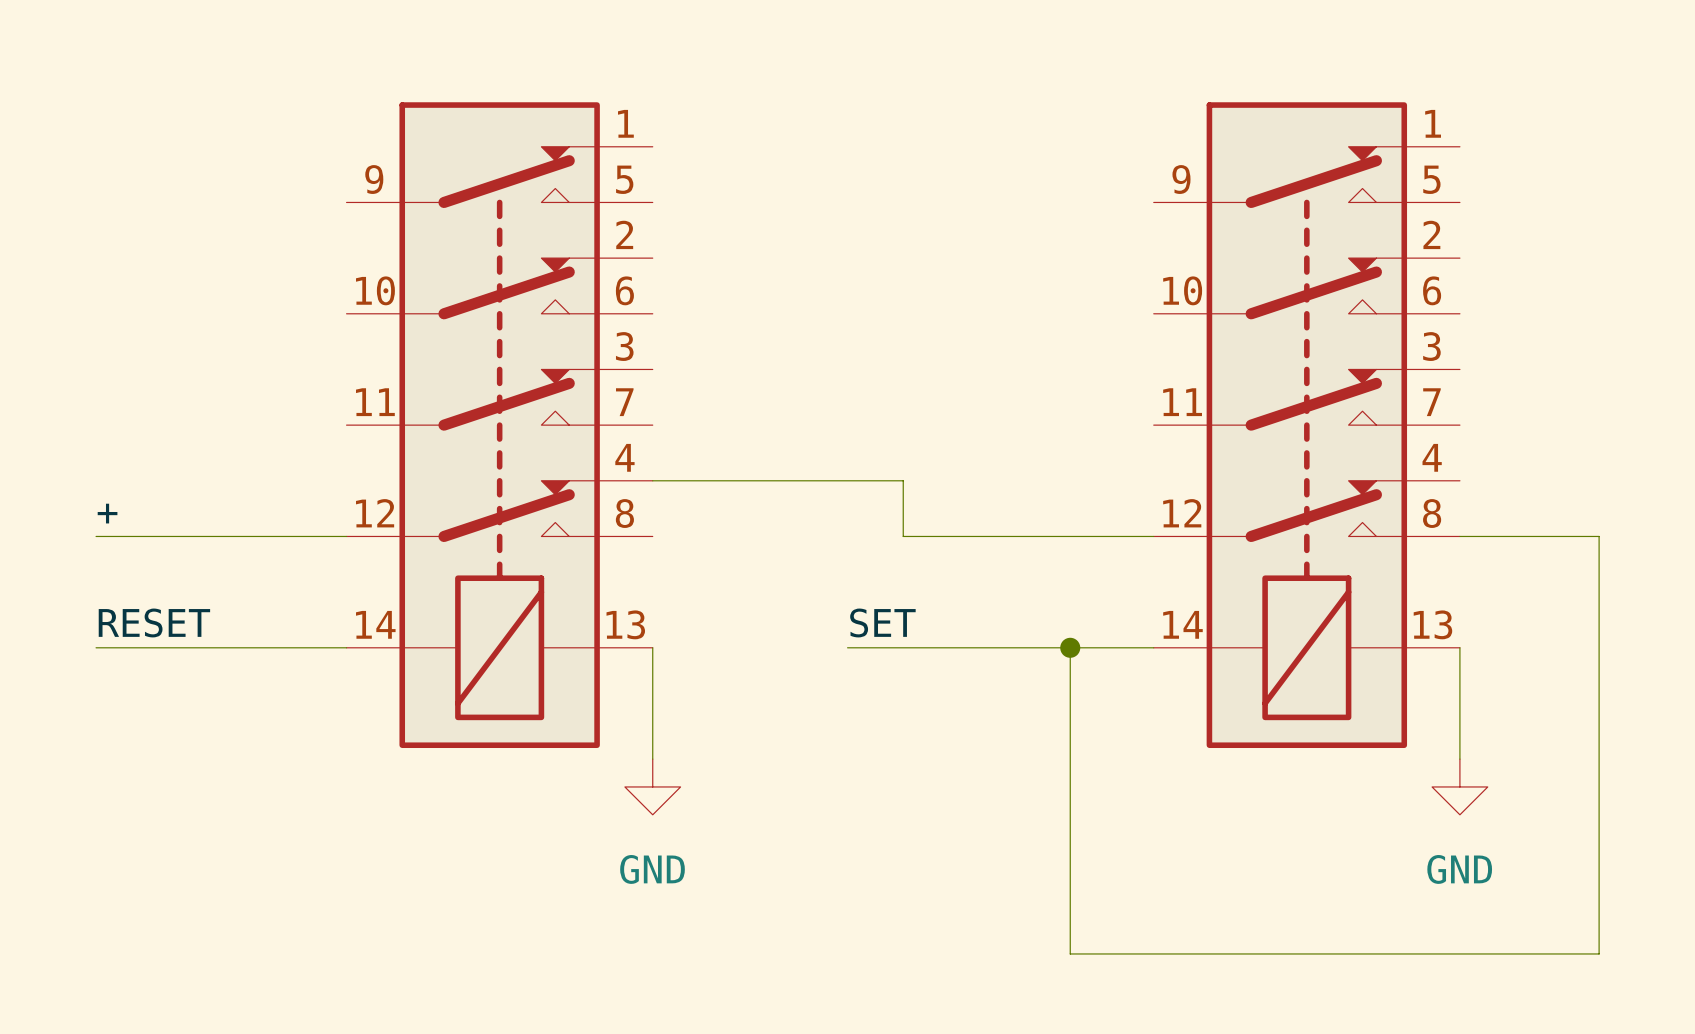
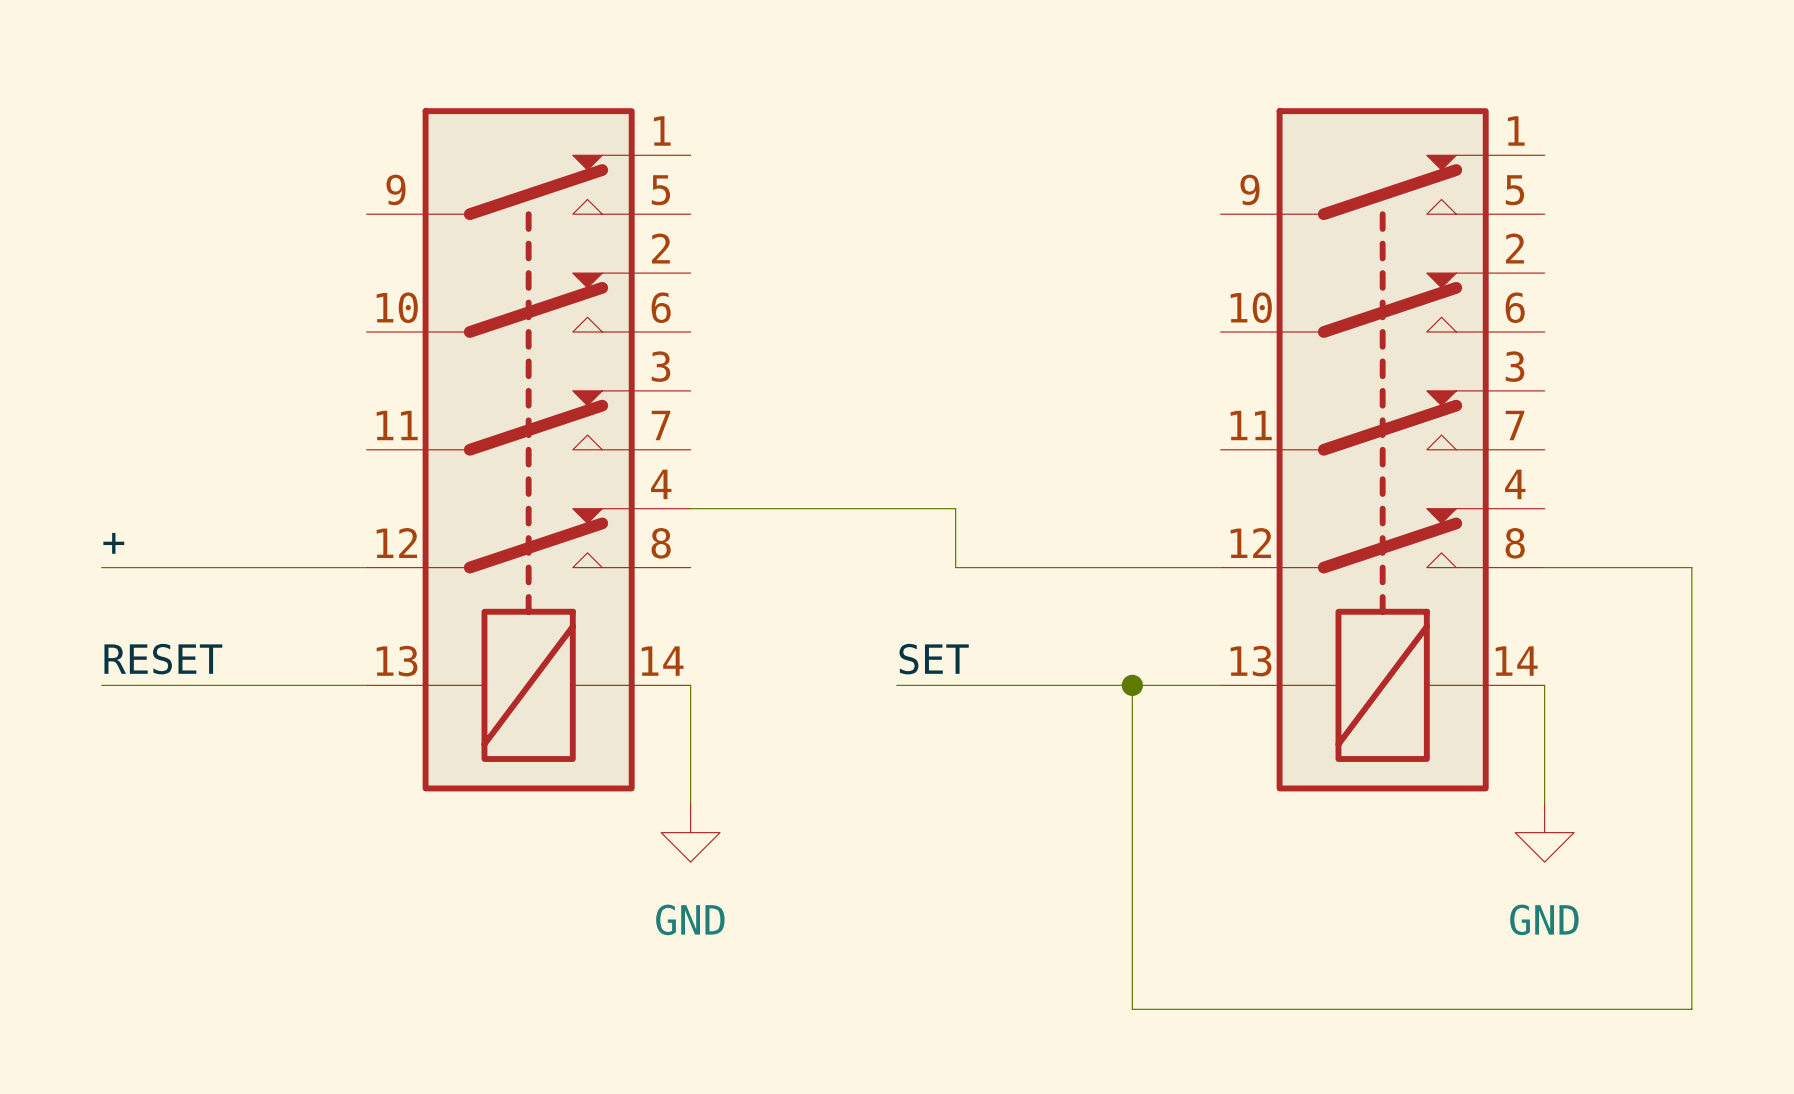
part pin number: 14 (375, 624) -> 13 (397, 661)
part pin number: 13 (625, 624) -> 14 (662, 661)
part pin number: 14 (1182, 624) -> 13 (1251, 661)
part pin number: 13 (1432, 624) -> 14 (1516, 661)

